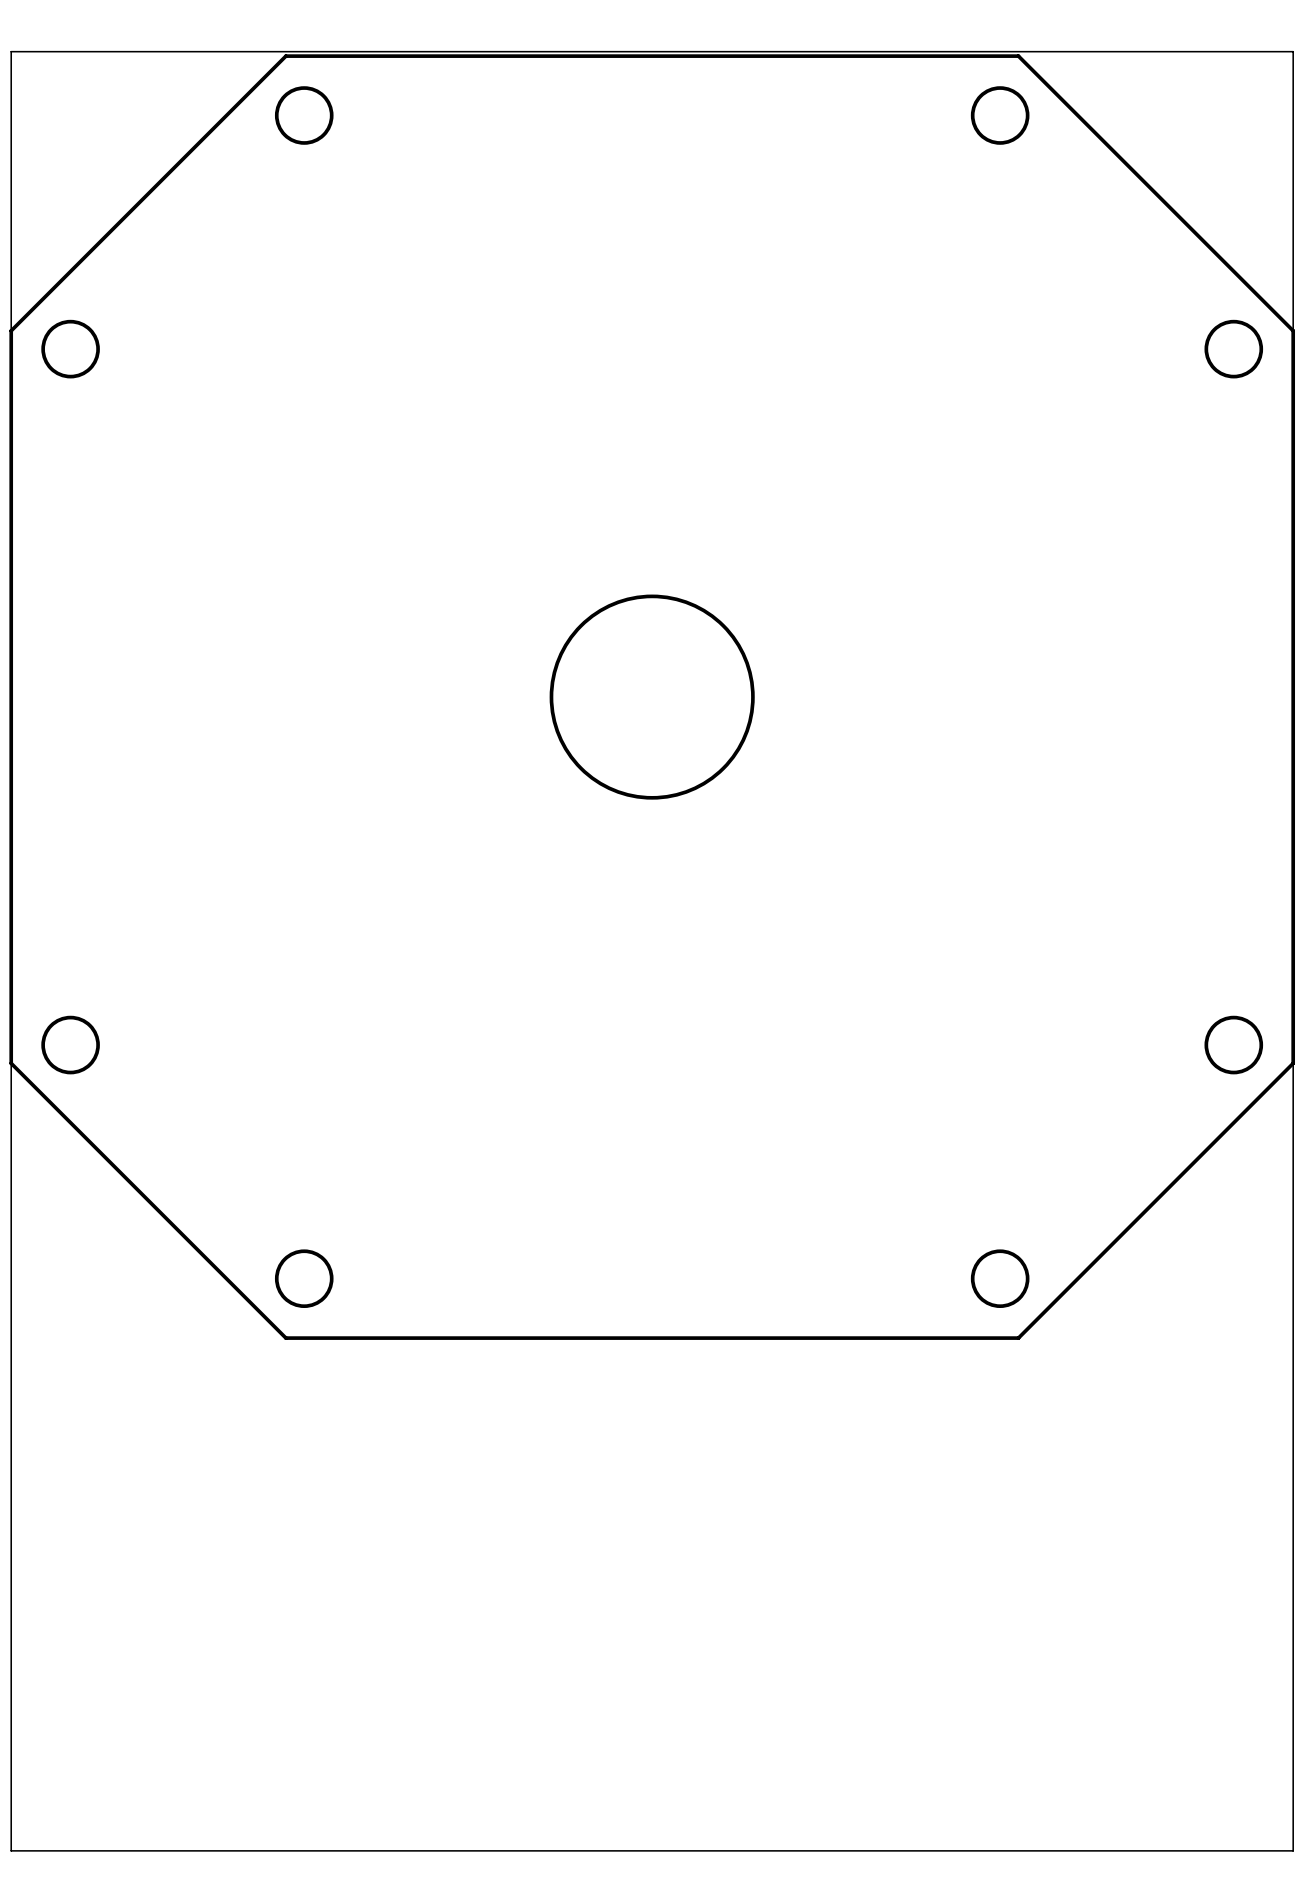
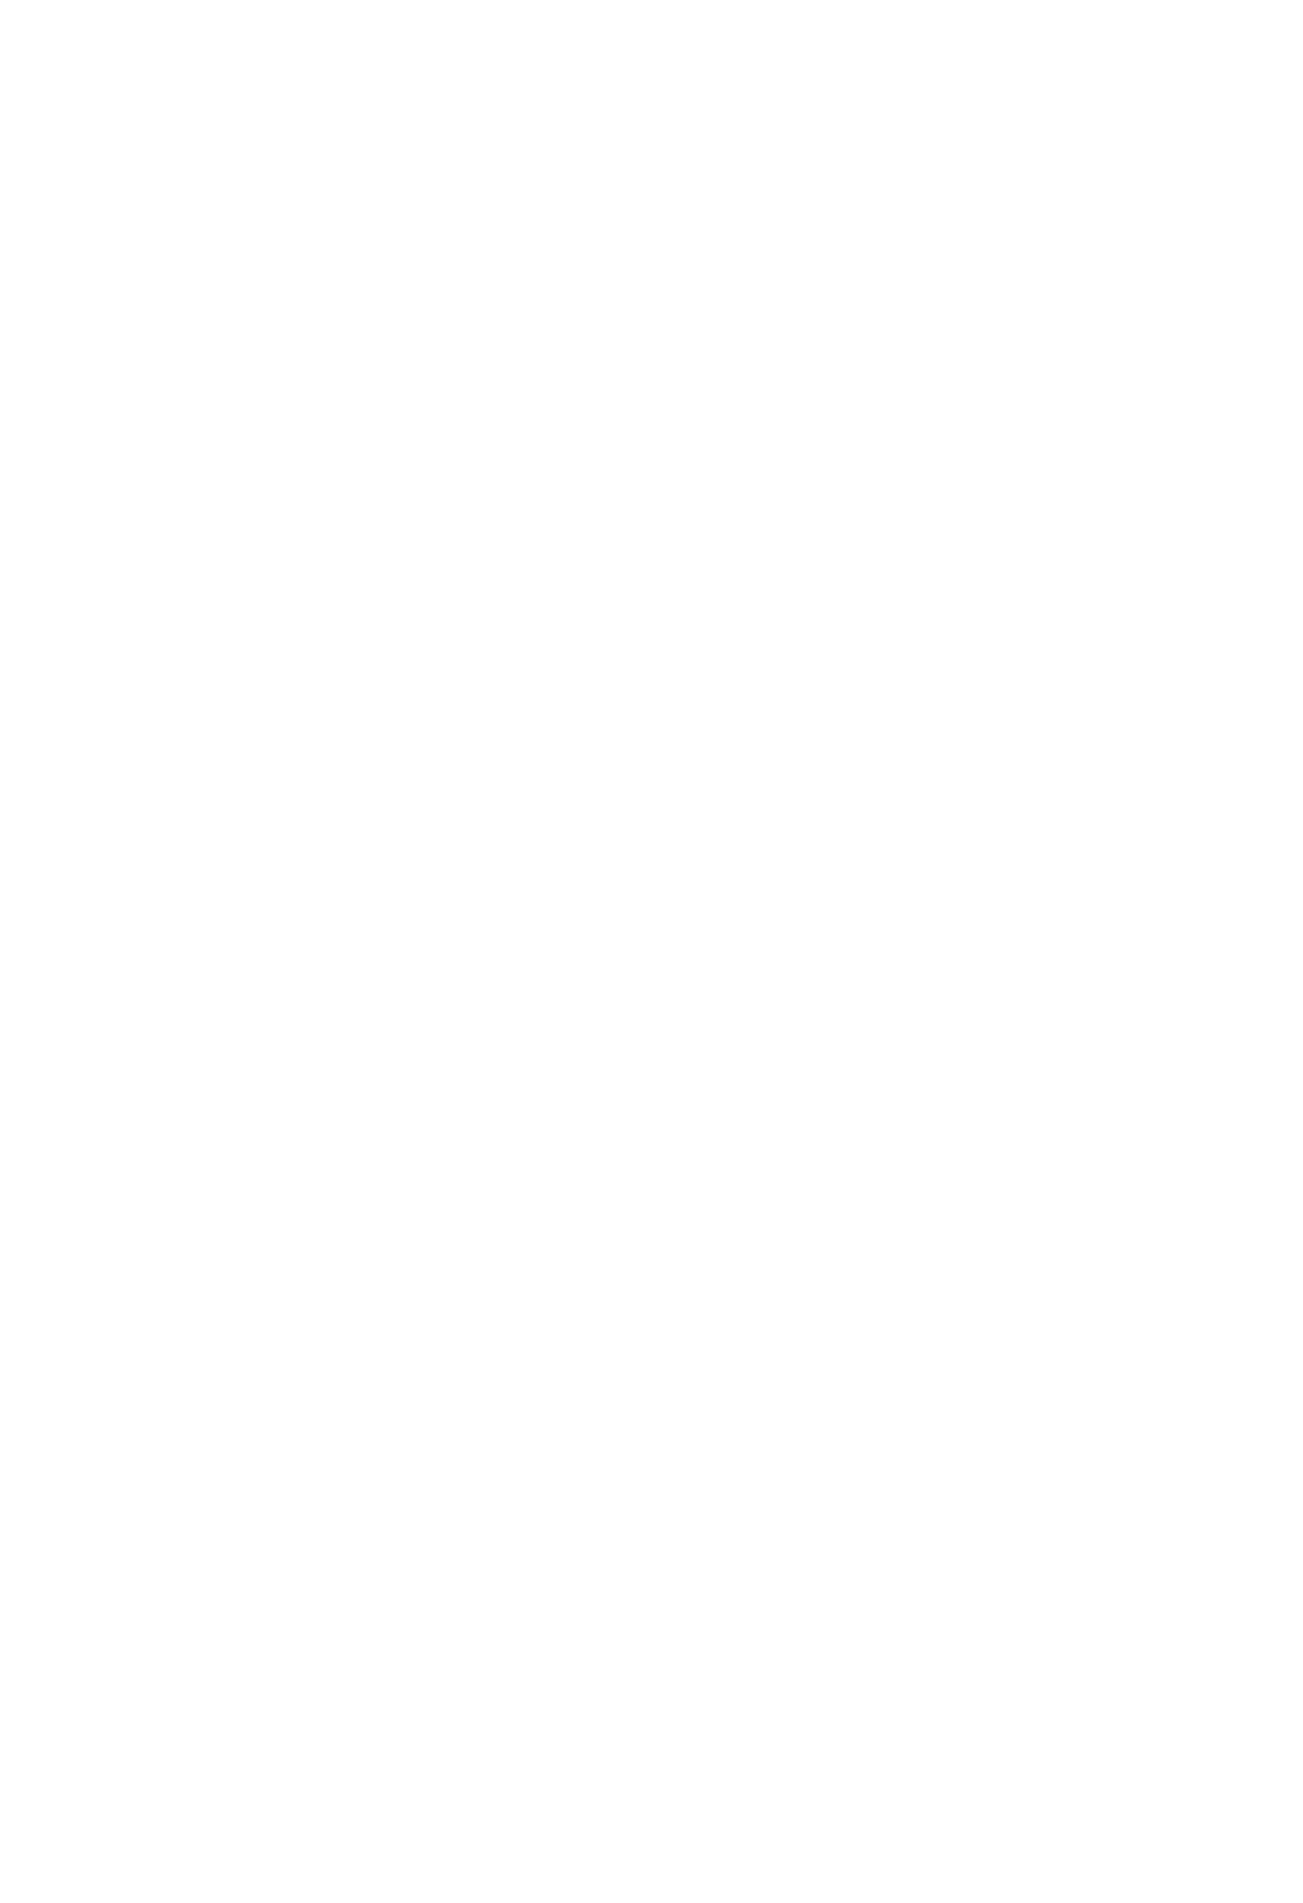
board edge: (11, 51) (1293, 51) (1293, 1850) (11, 1850) (11, 51) -> none
line: (285, 56) (11, 330) (11, 1063) (285, 1338) (1018, 1338) (1293, 1063) (1293, 330) (1018, 56) (285, 56) -> none
drawing: [274, 86, 334, 145] -> none
drawing: [970, 86, 1030, 145] -> none
drawing: [41, 319, 100, 379] -> none
drawing: [1204, 319, 1264, 379] -> none
drawing: [549, 594, 755, 800] -> none
drawing: [41, 1015, 100, 1075] -> none
drawing: [1204, 1015, 1264, 1075] -> none
drawing: [274, 1249, 334, 1309] -> none
drawing: [970, 1249, 1030, 1309] -> none

